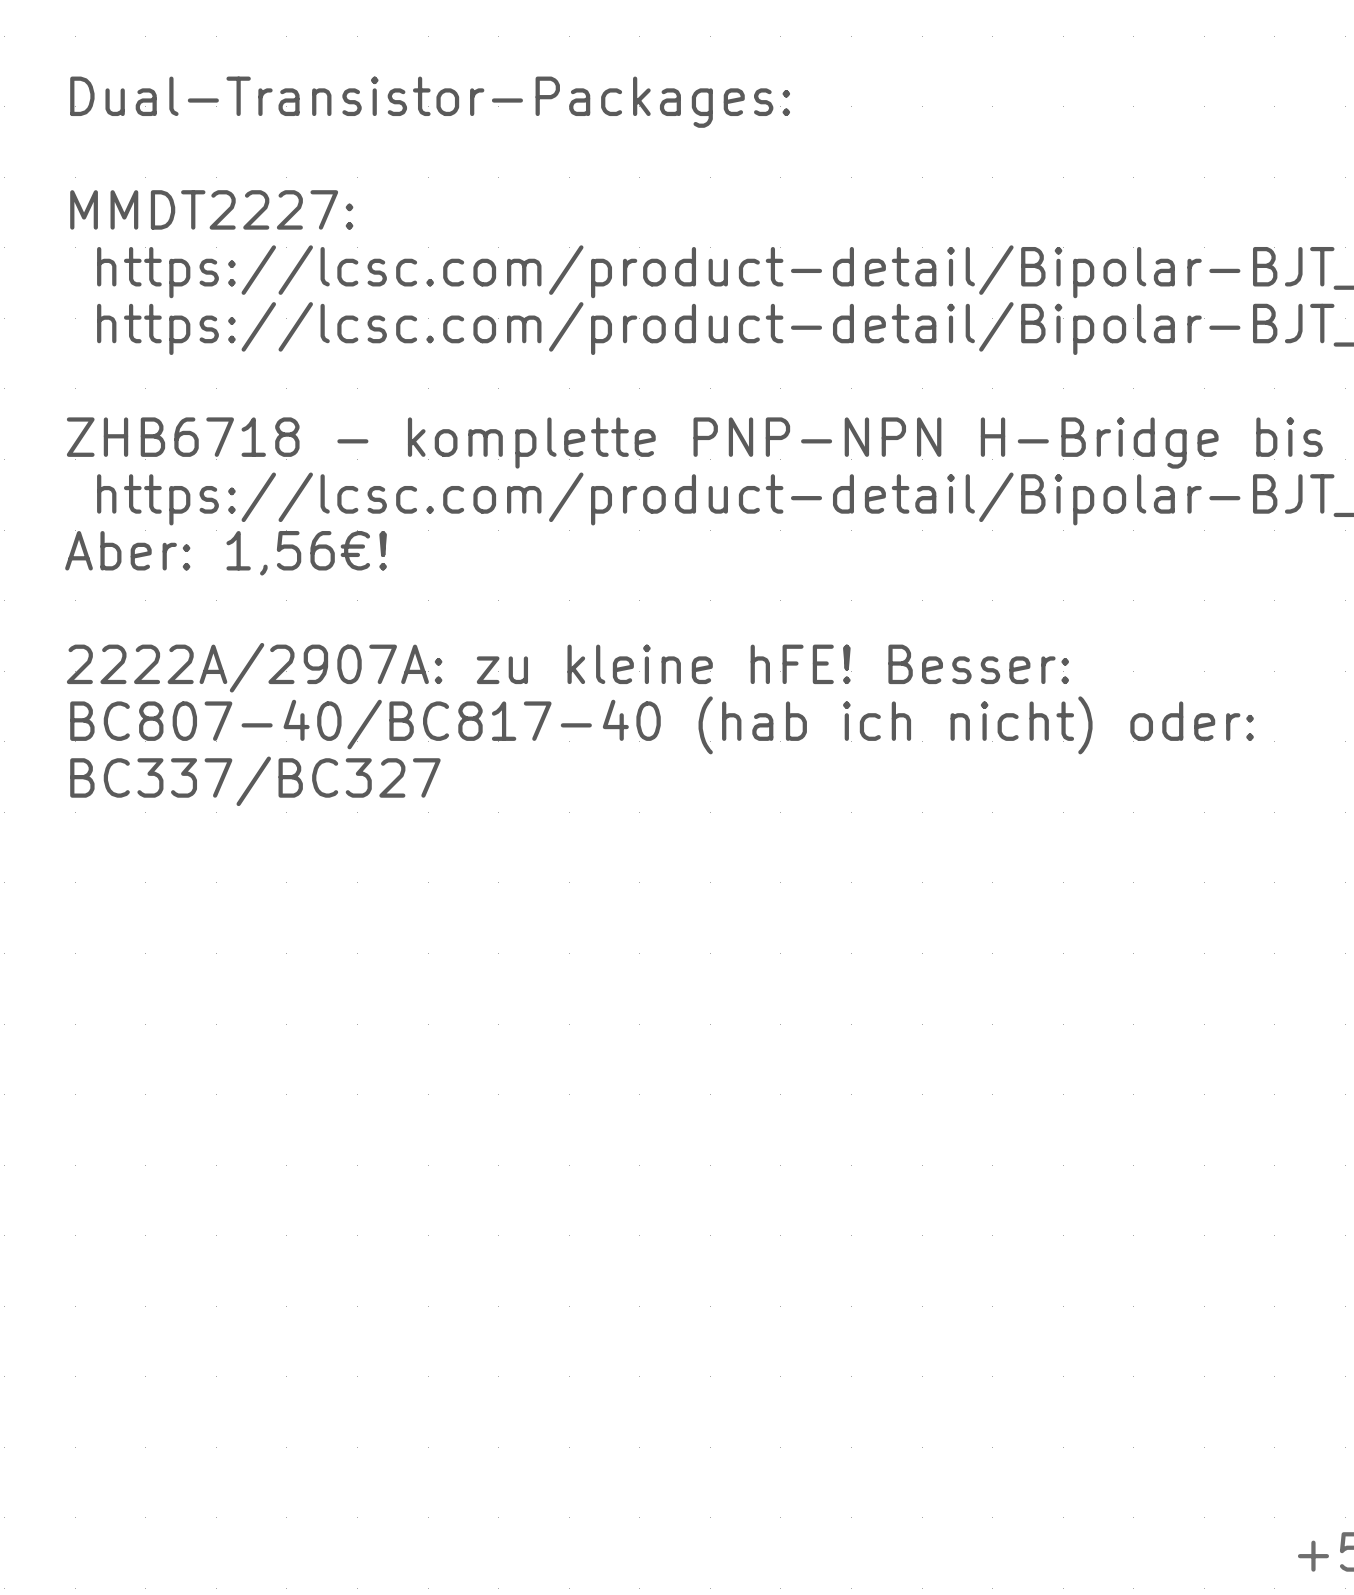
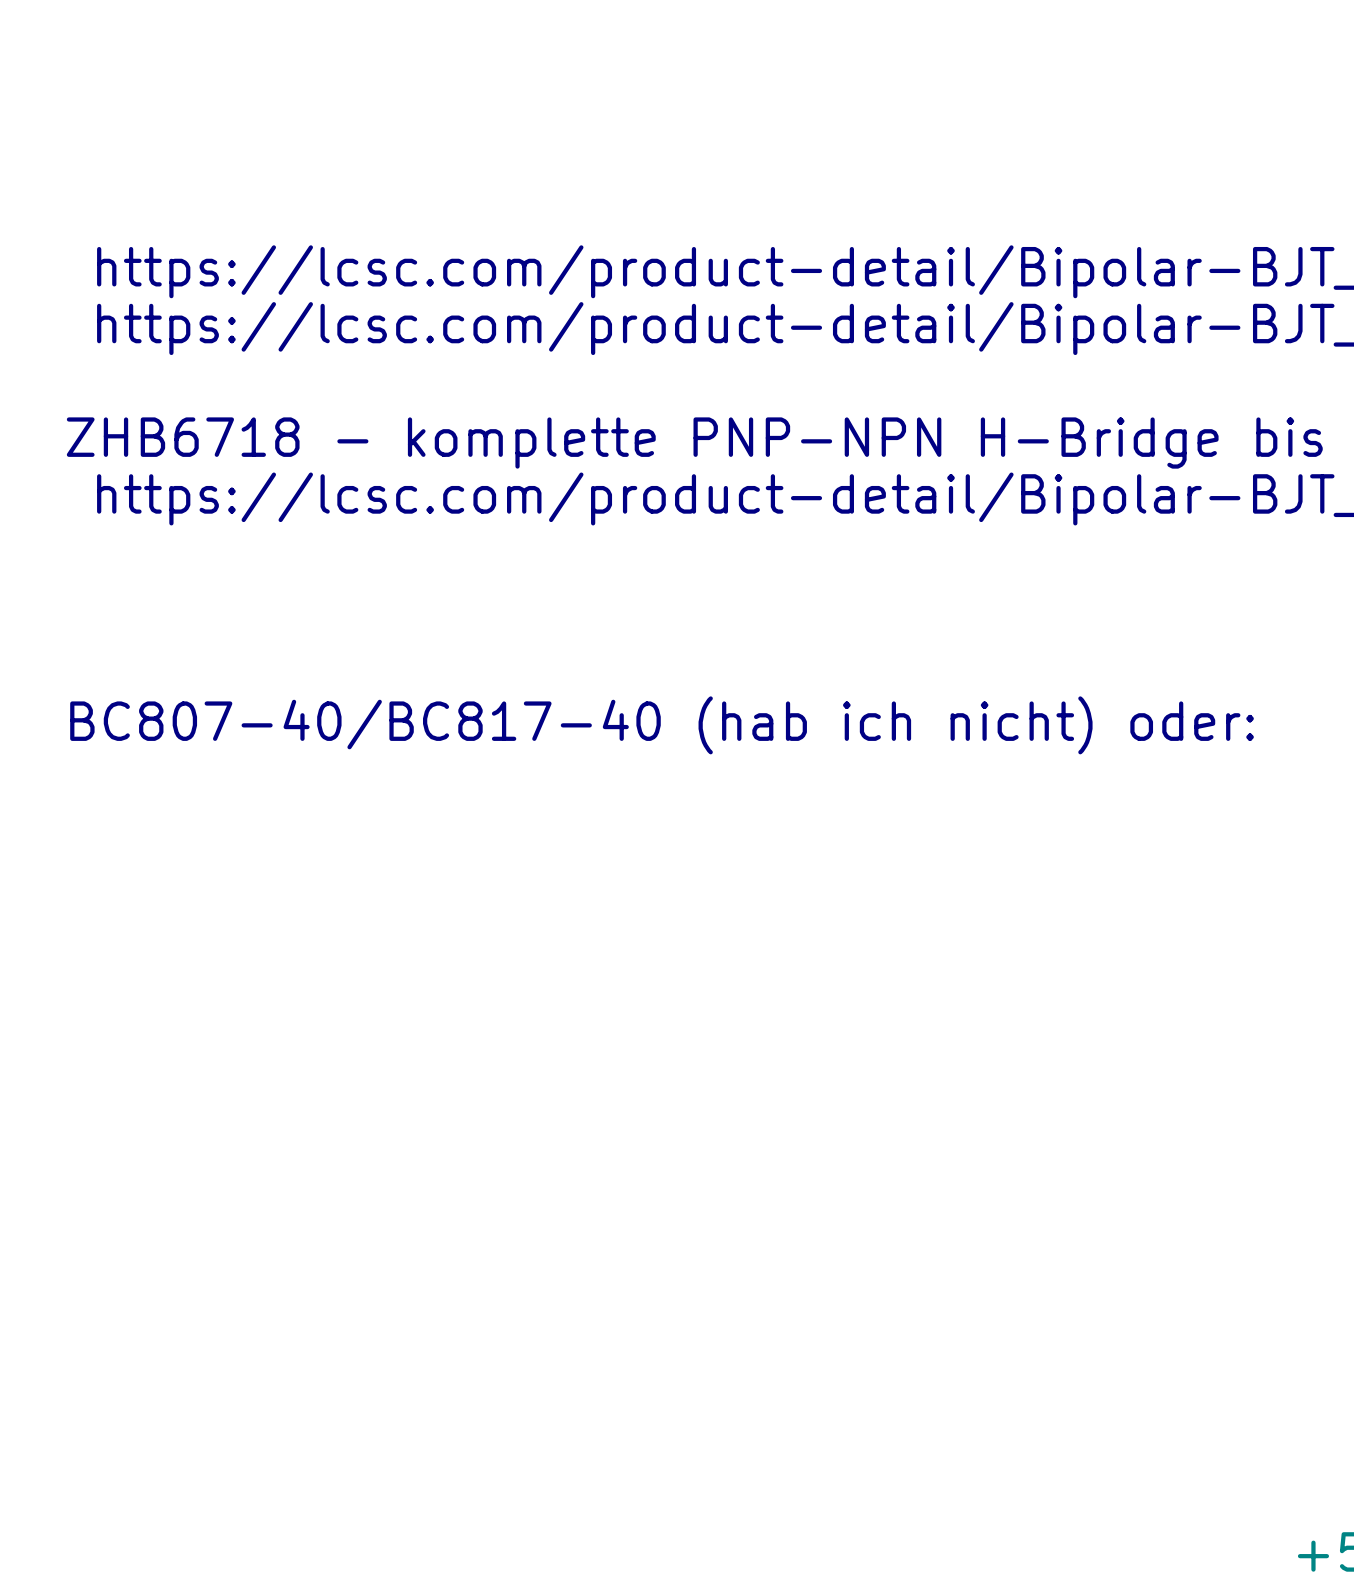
text: Dual-Transistor-Packages: (430, 102) -> none
text: MMDT2227: (211, 209) -> none
text: Aber: 1,56€! (226, 553) -> none
text: 2222A/2907A: zu kleine hFE! Besser: (567, 667) -> none
text: BC337/BC327 (255, 781) -> none

